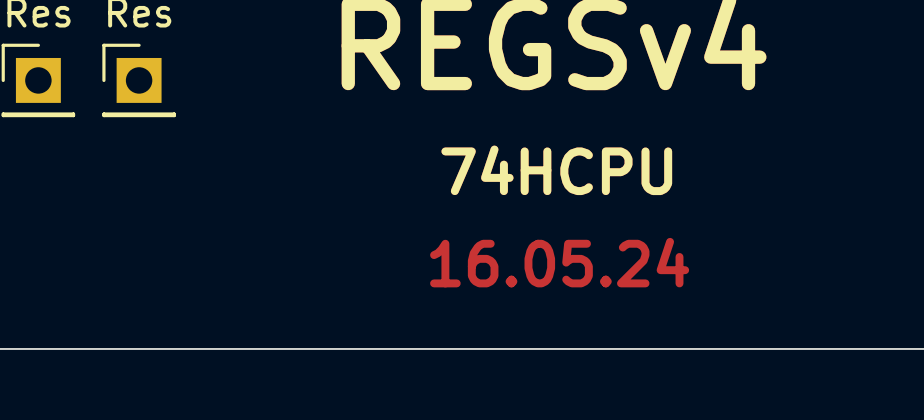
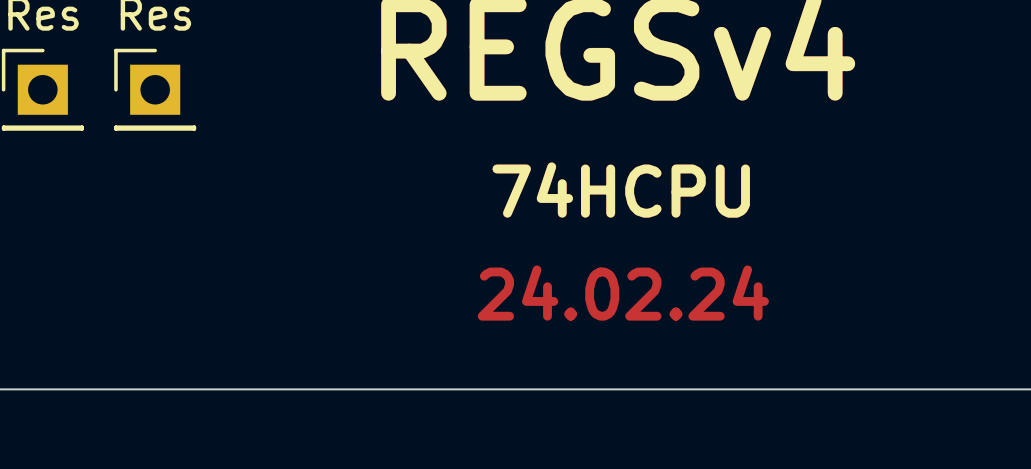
text: 16.05.24 (559, 262) -> 24.02.24 (623, 293)

